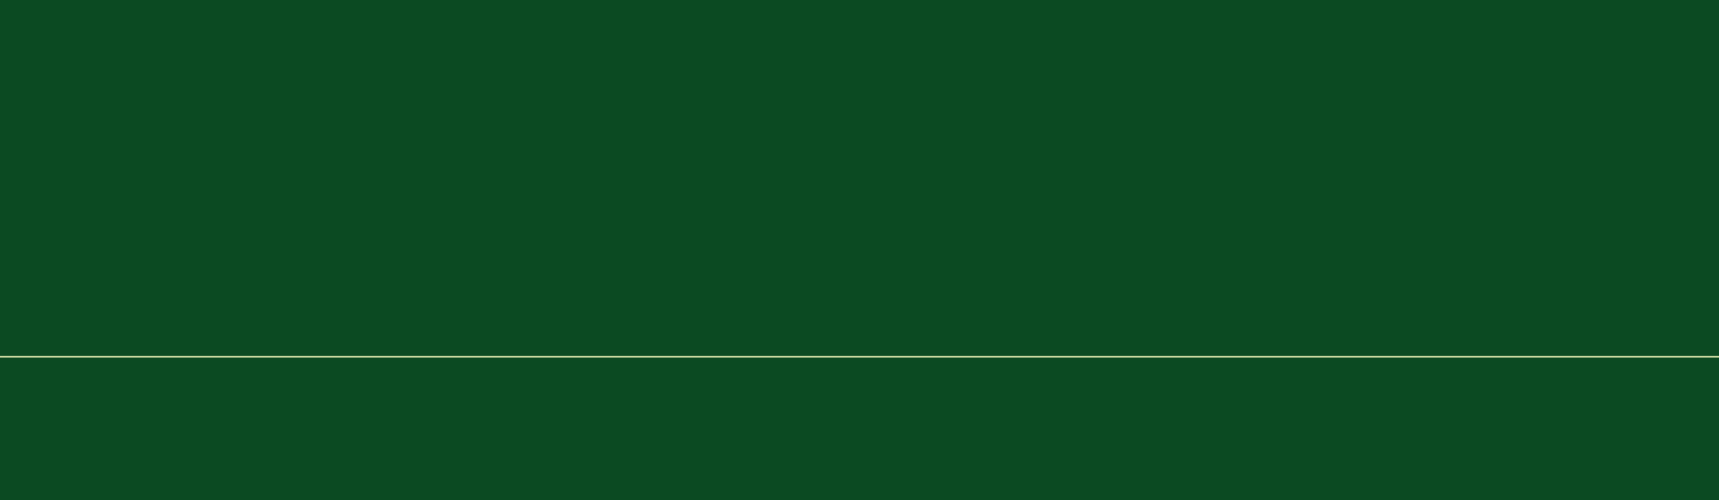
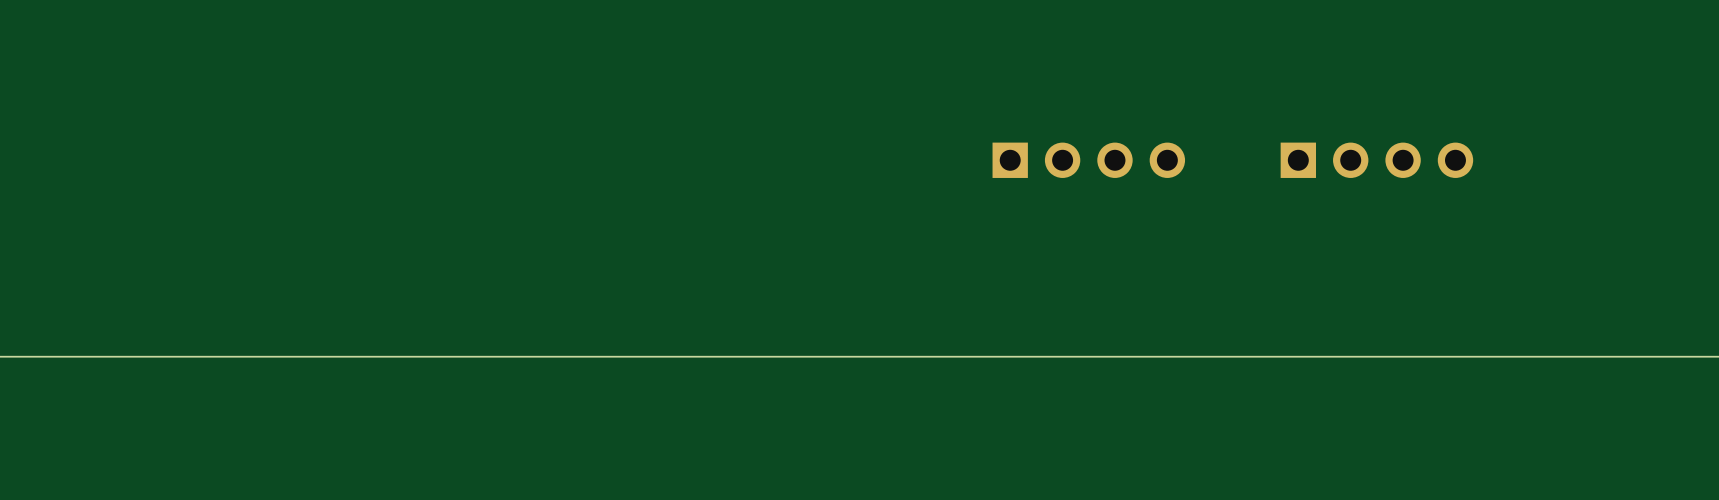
part: none -> (1088, 160)
part: none -> (1376, 160)

